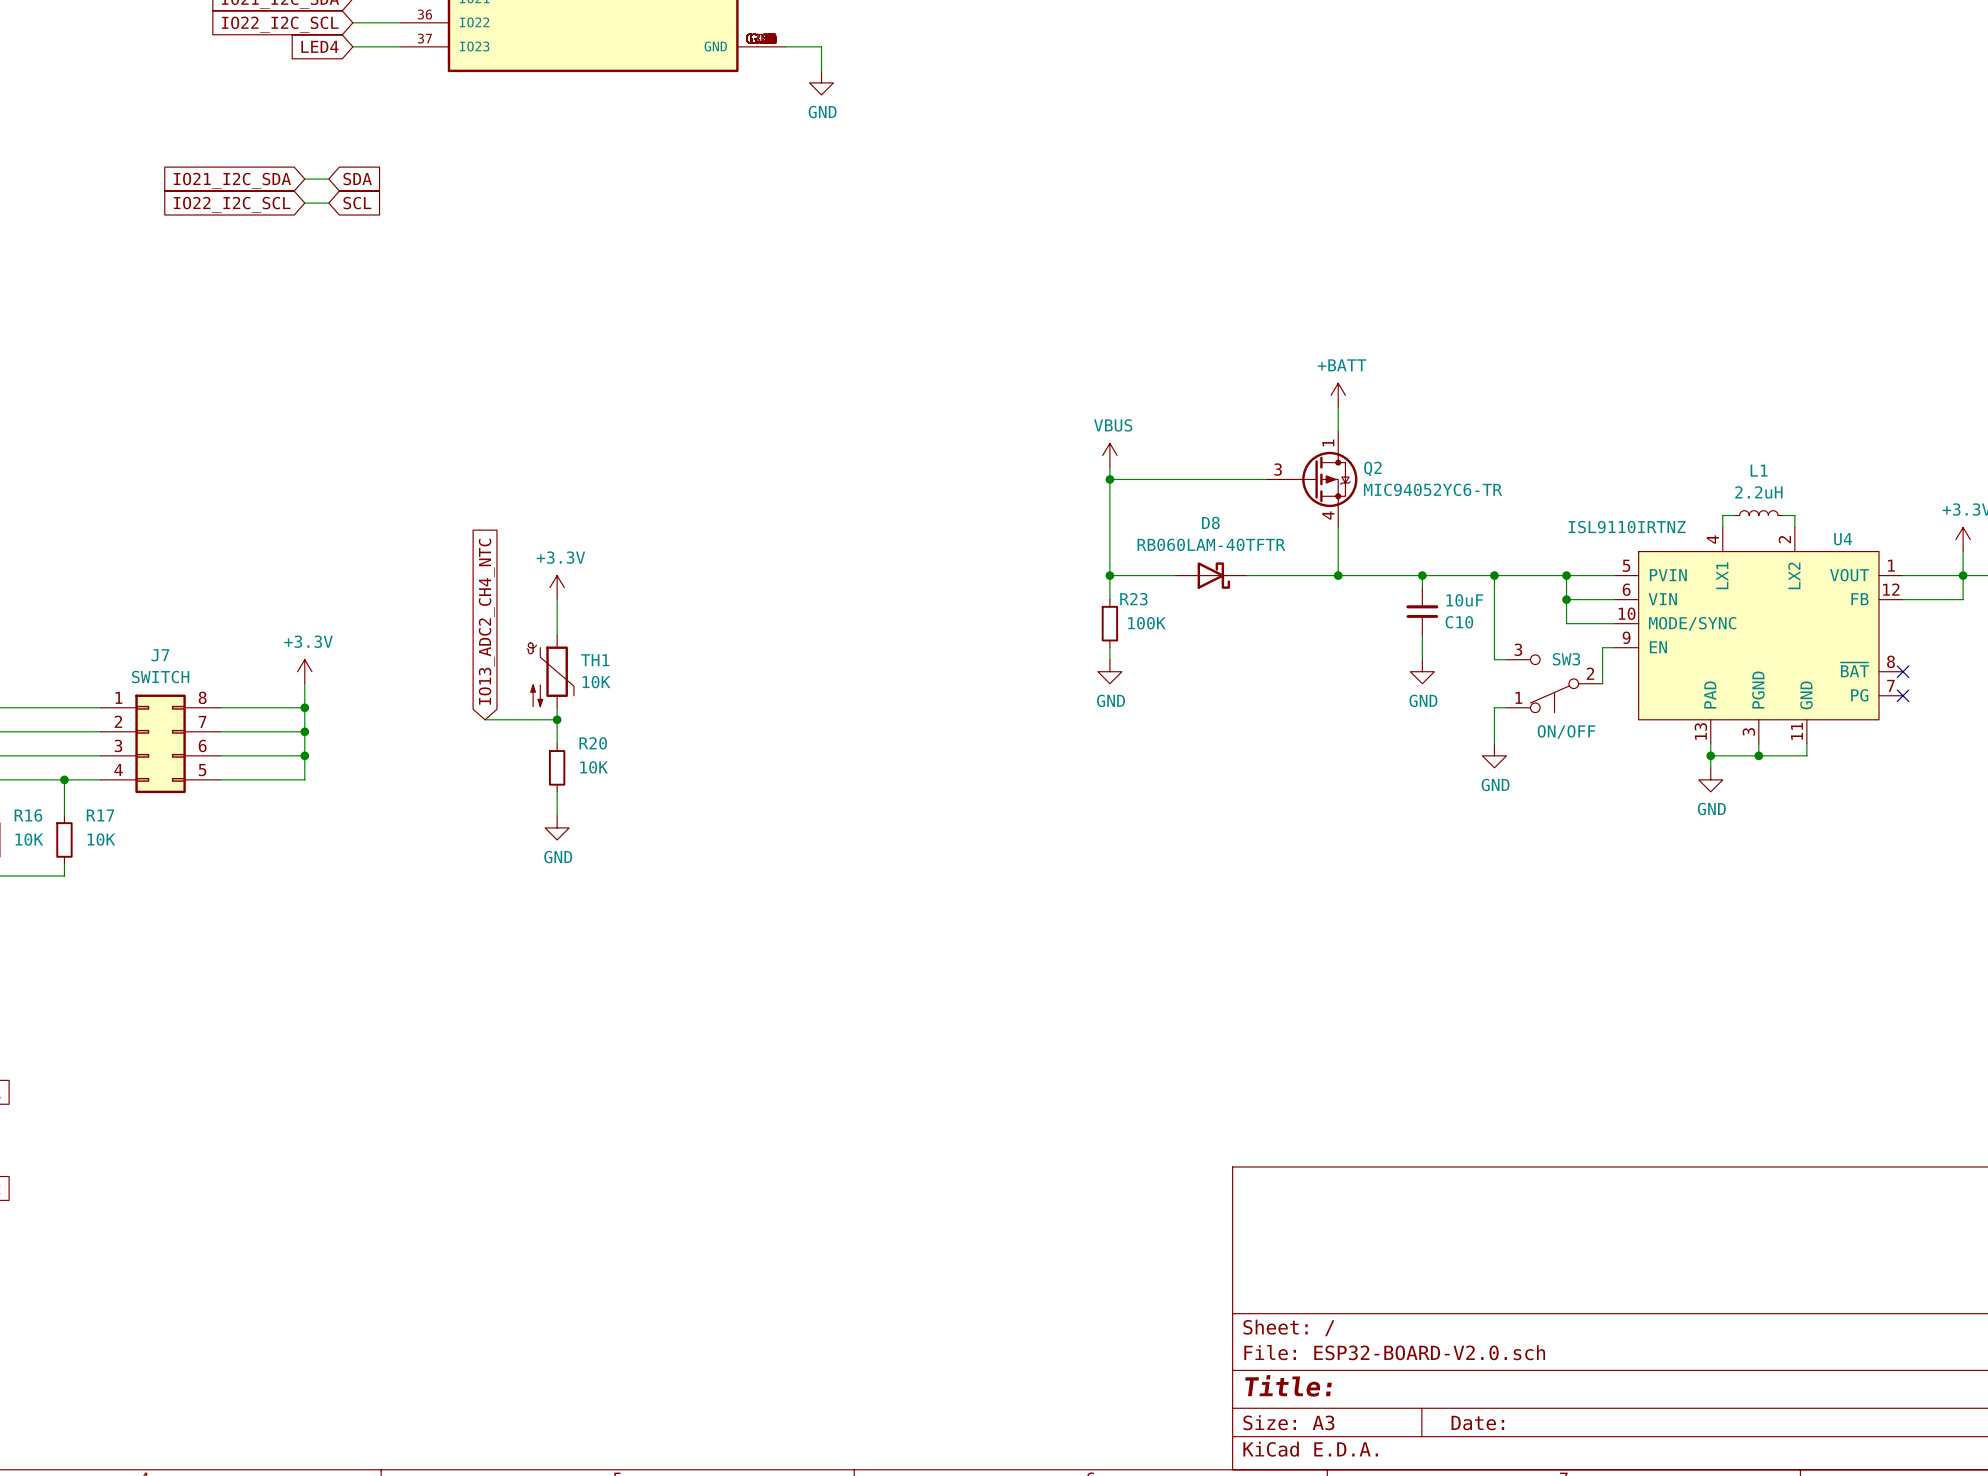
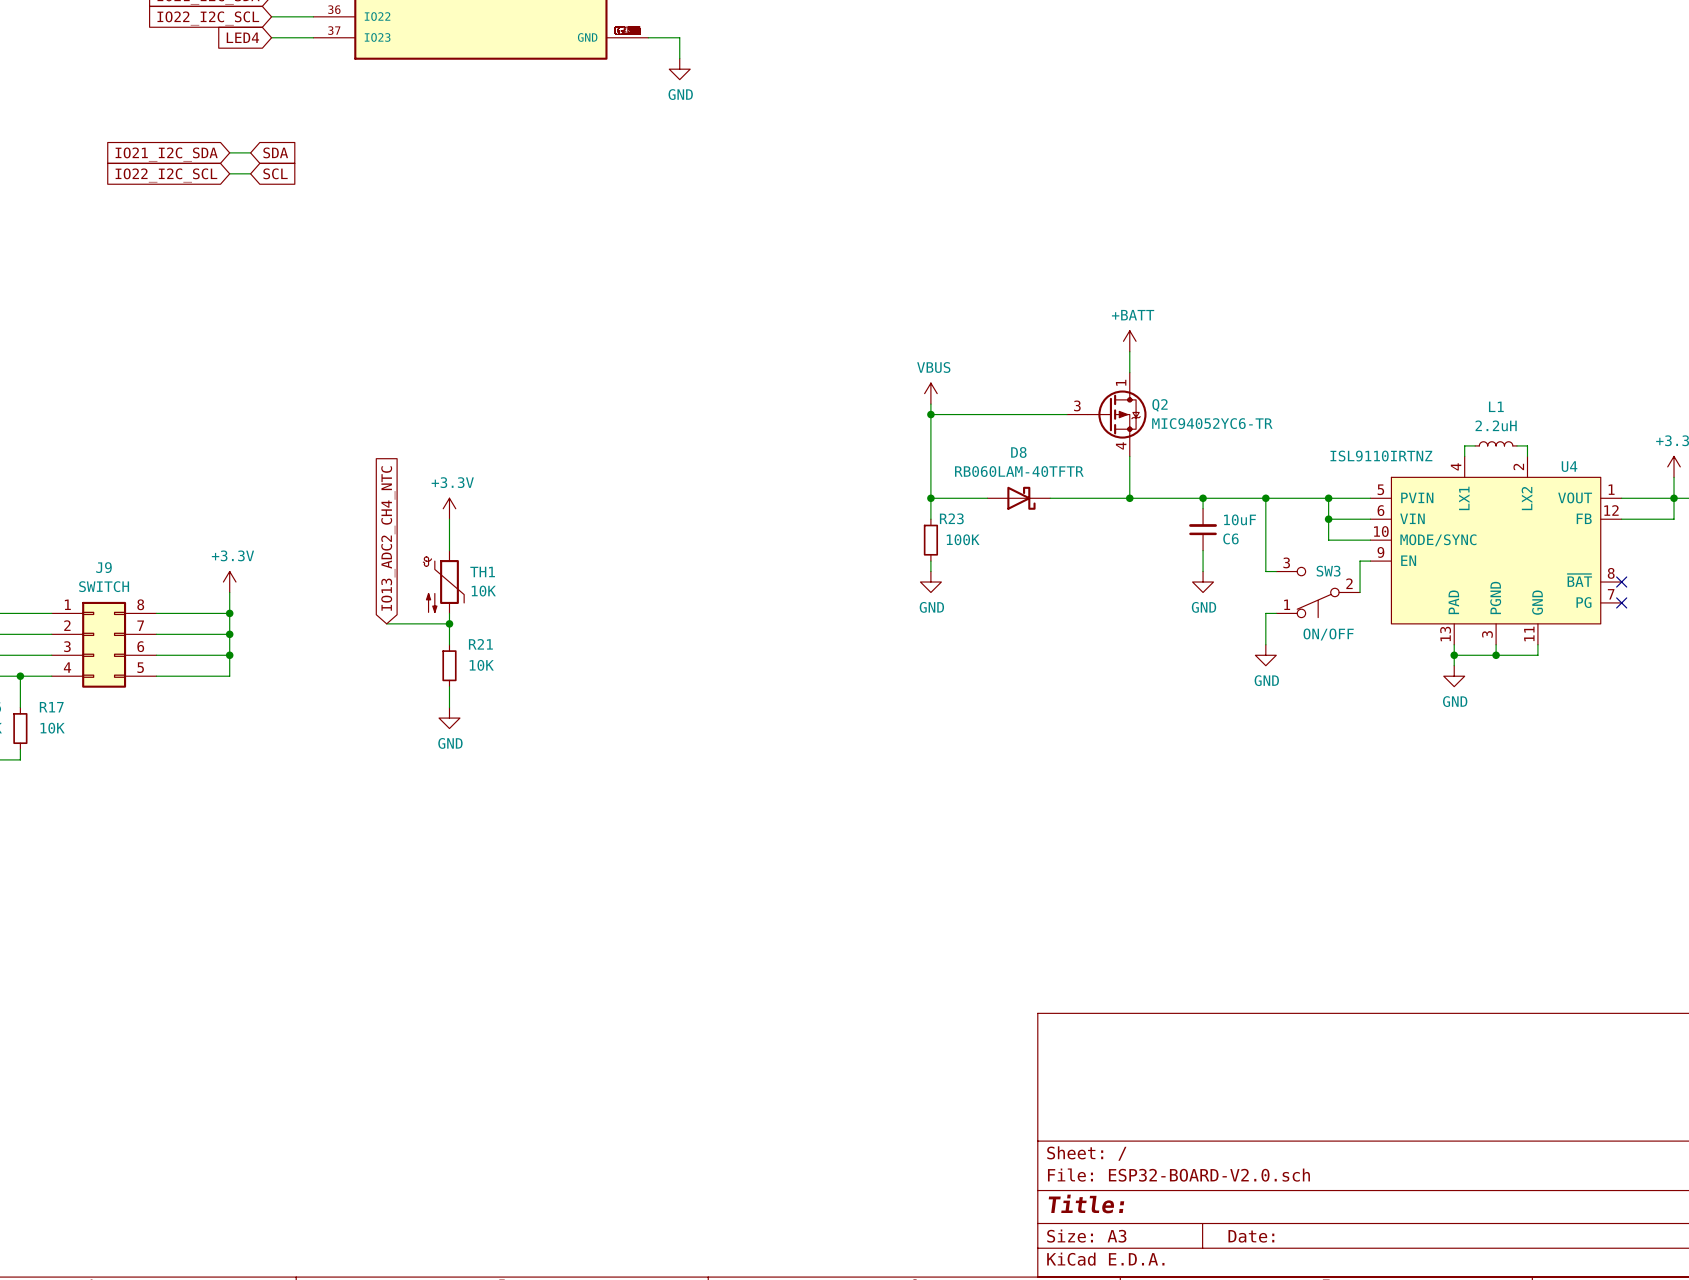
C10 name: C10 (1459, 622) -> C6 (1230, 538)
J7 name: J7 (160, 655) -> J9 (104, 567)
R20 name: R20 (593, 743) -> R21 (480, 644)

